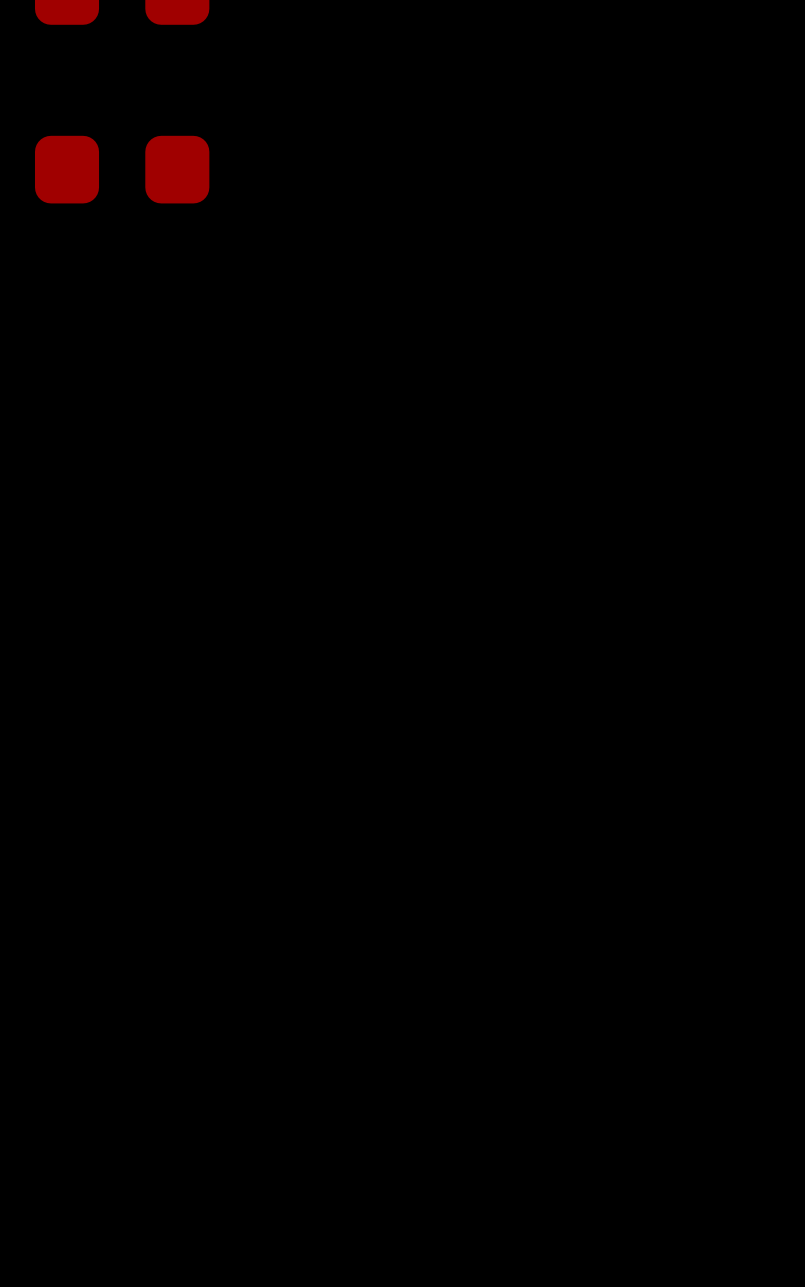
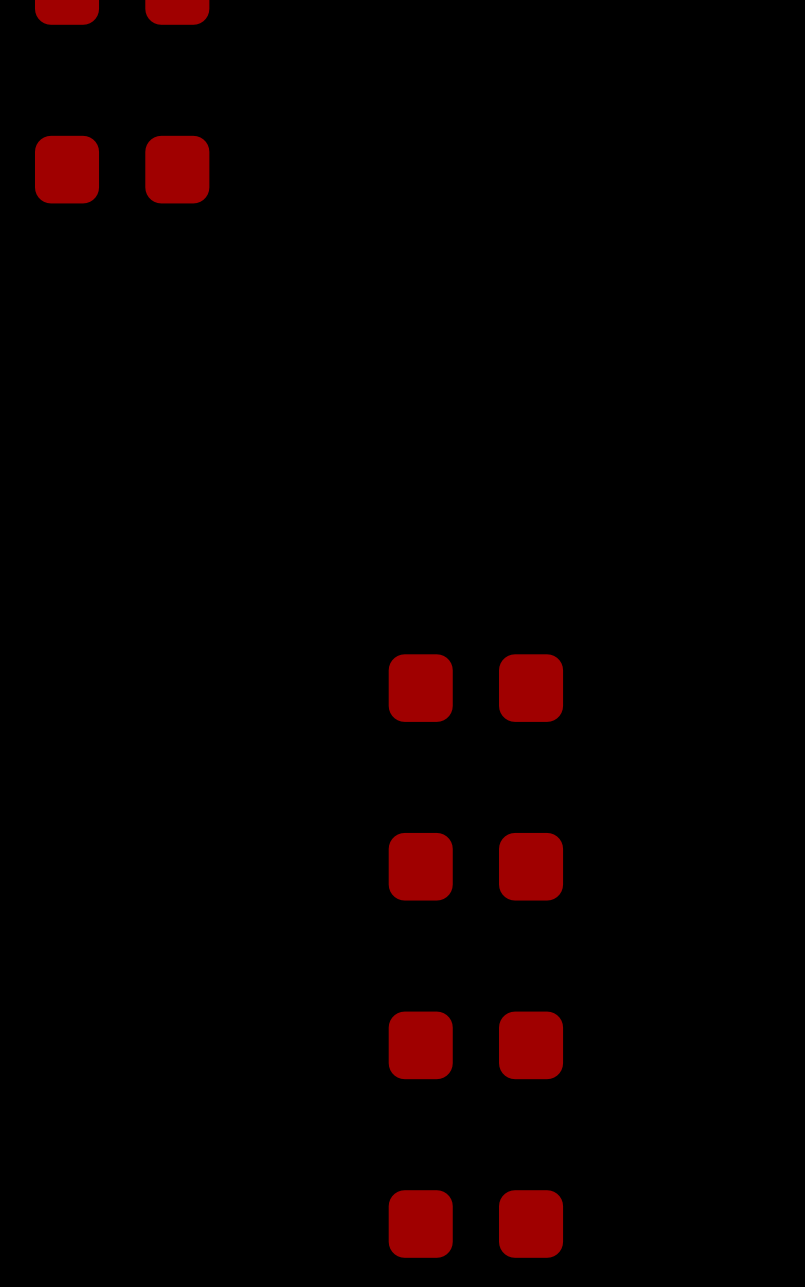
part: none -> (475, 688)
part: none -> (475, 866)
part: none -> (475, 1045)
part: none -> (475, 1224)

